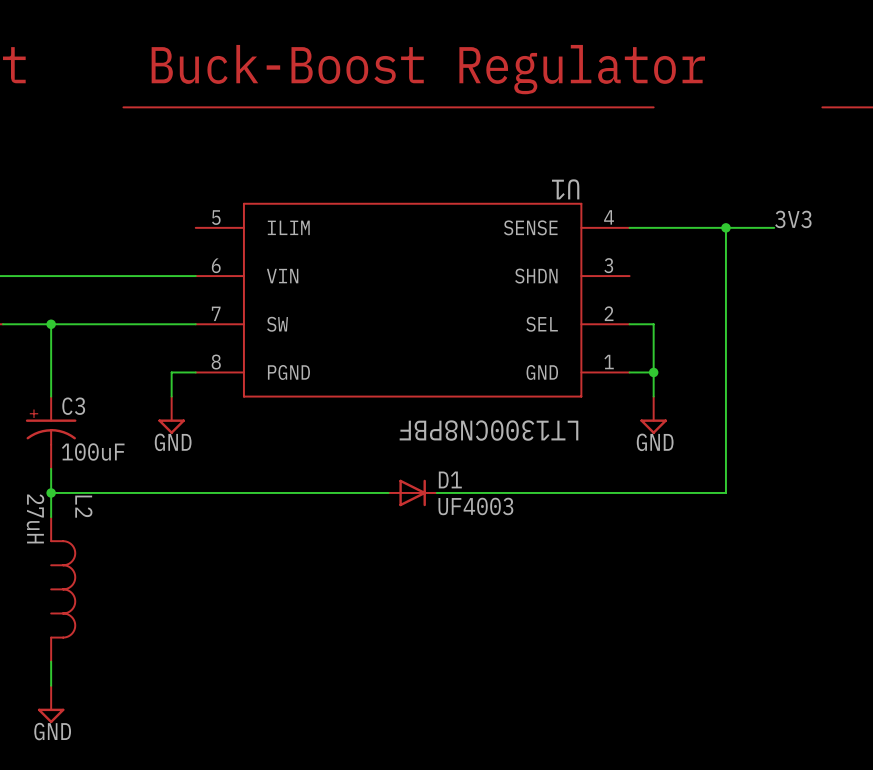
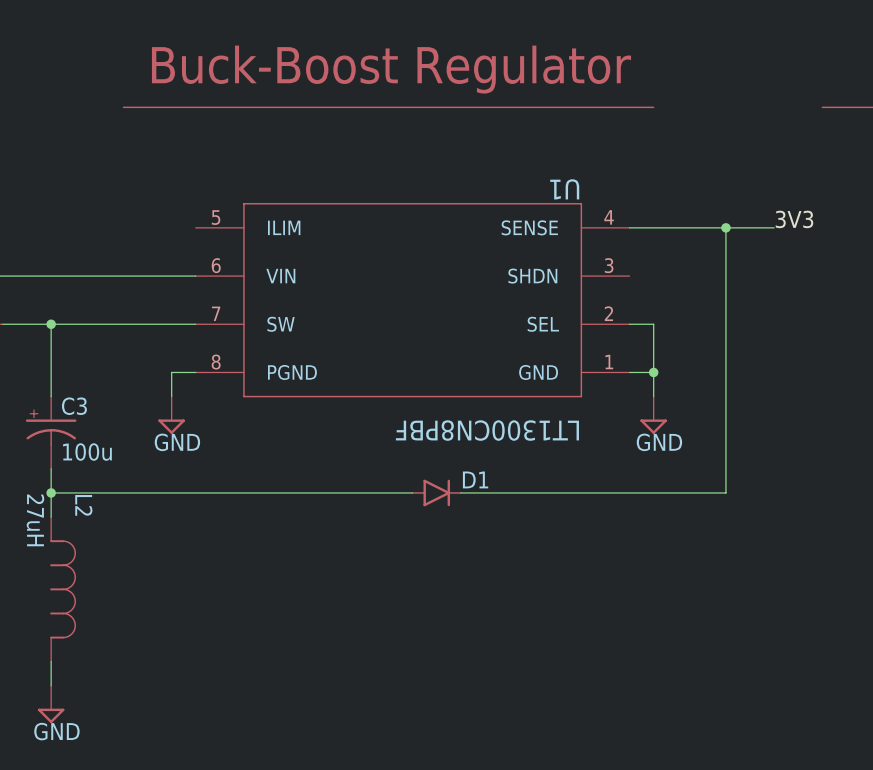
C3 value: 100uF (93, 452) -> 100u (87, 452)
D1 symbol: [388, 479, 437, 507] -> [411, 479, 462, 507]
D1 value: UF4003 (475, 506) -> none

